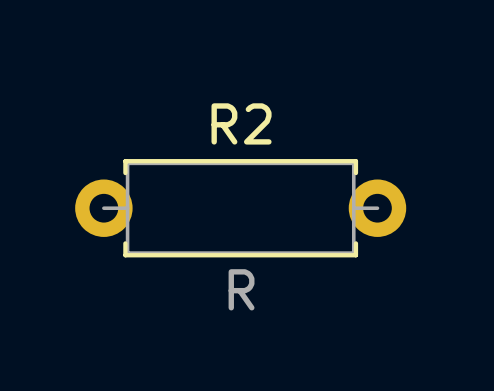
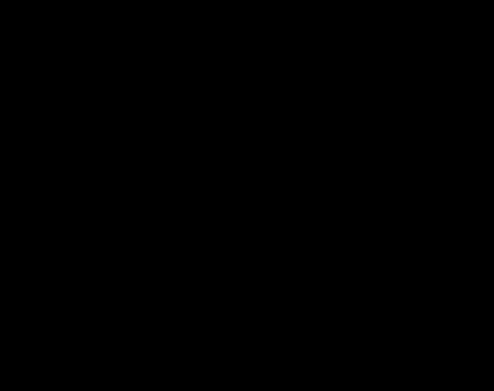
R2: R (240, 208) -> none

